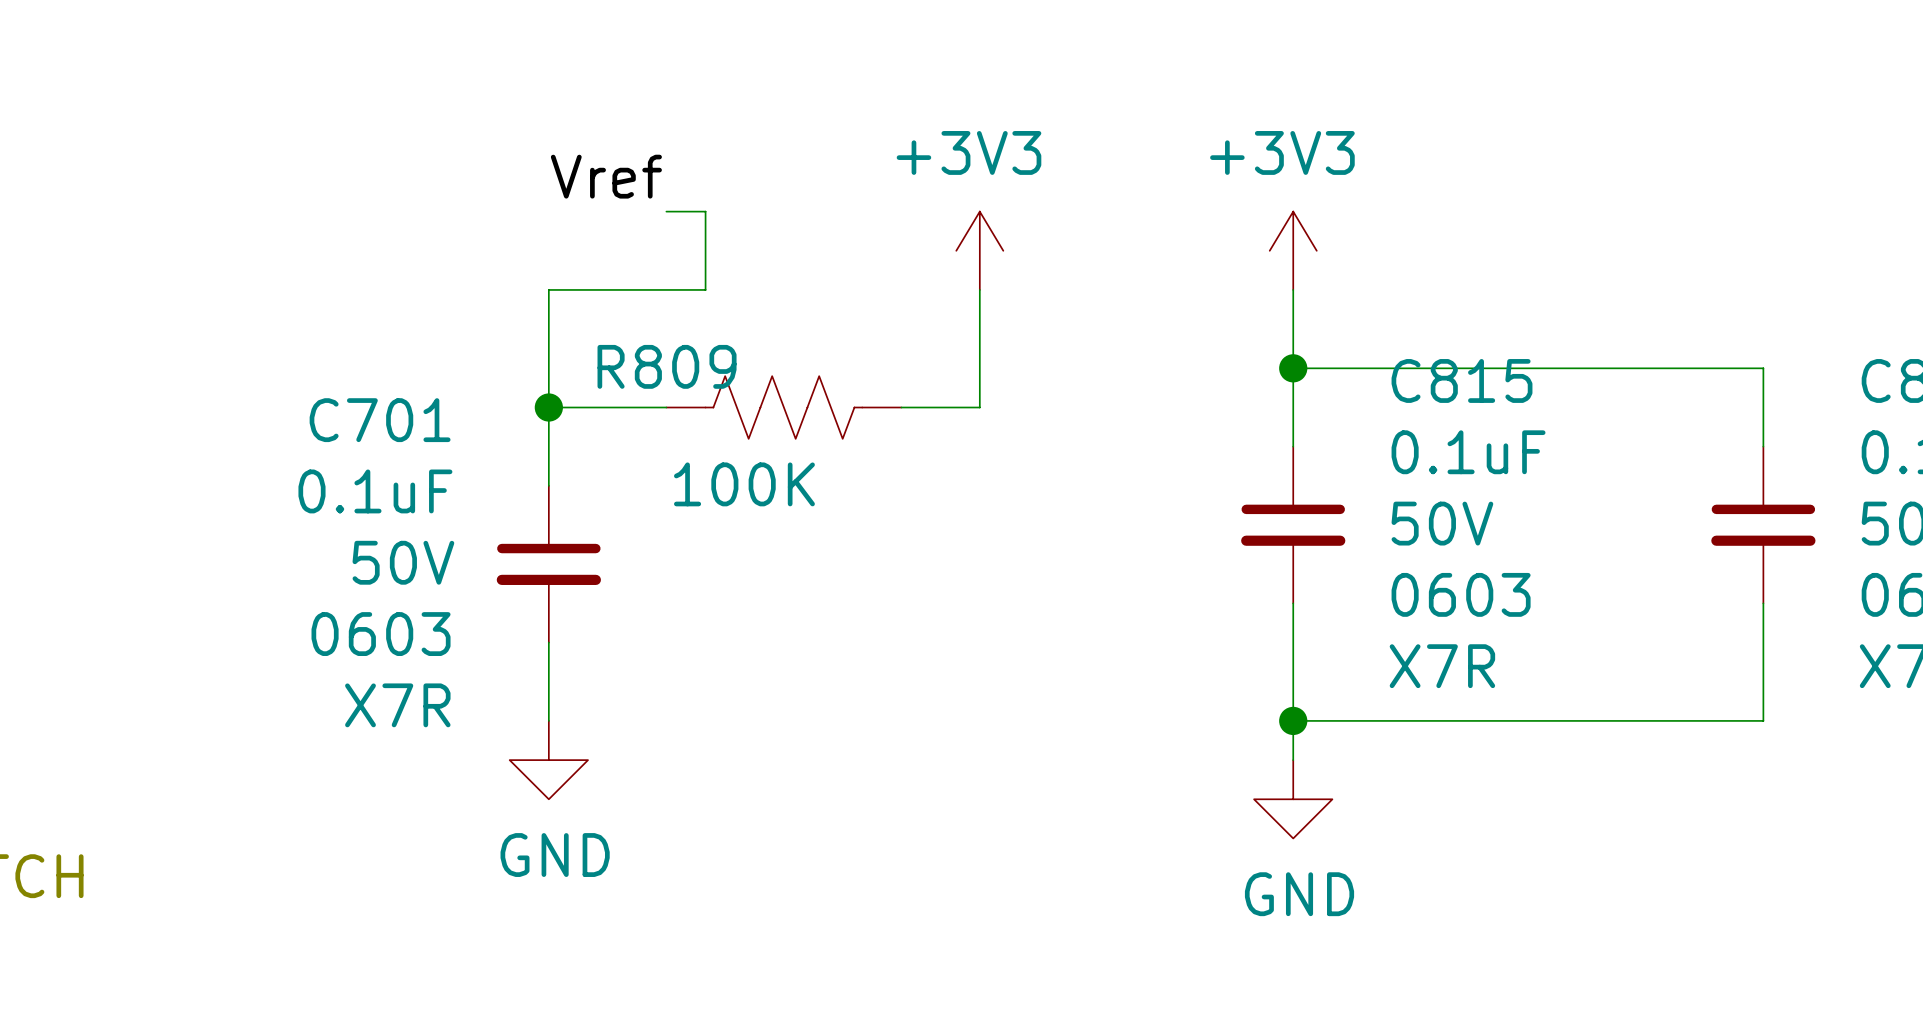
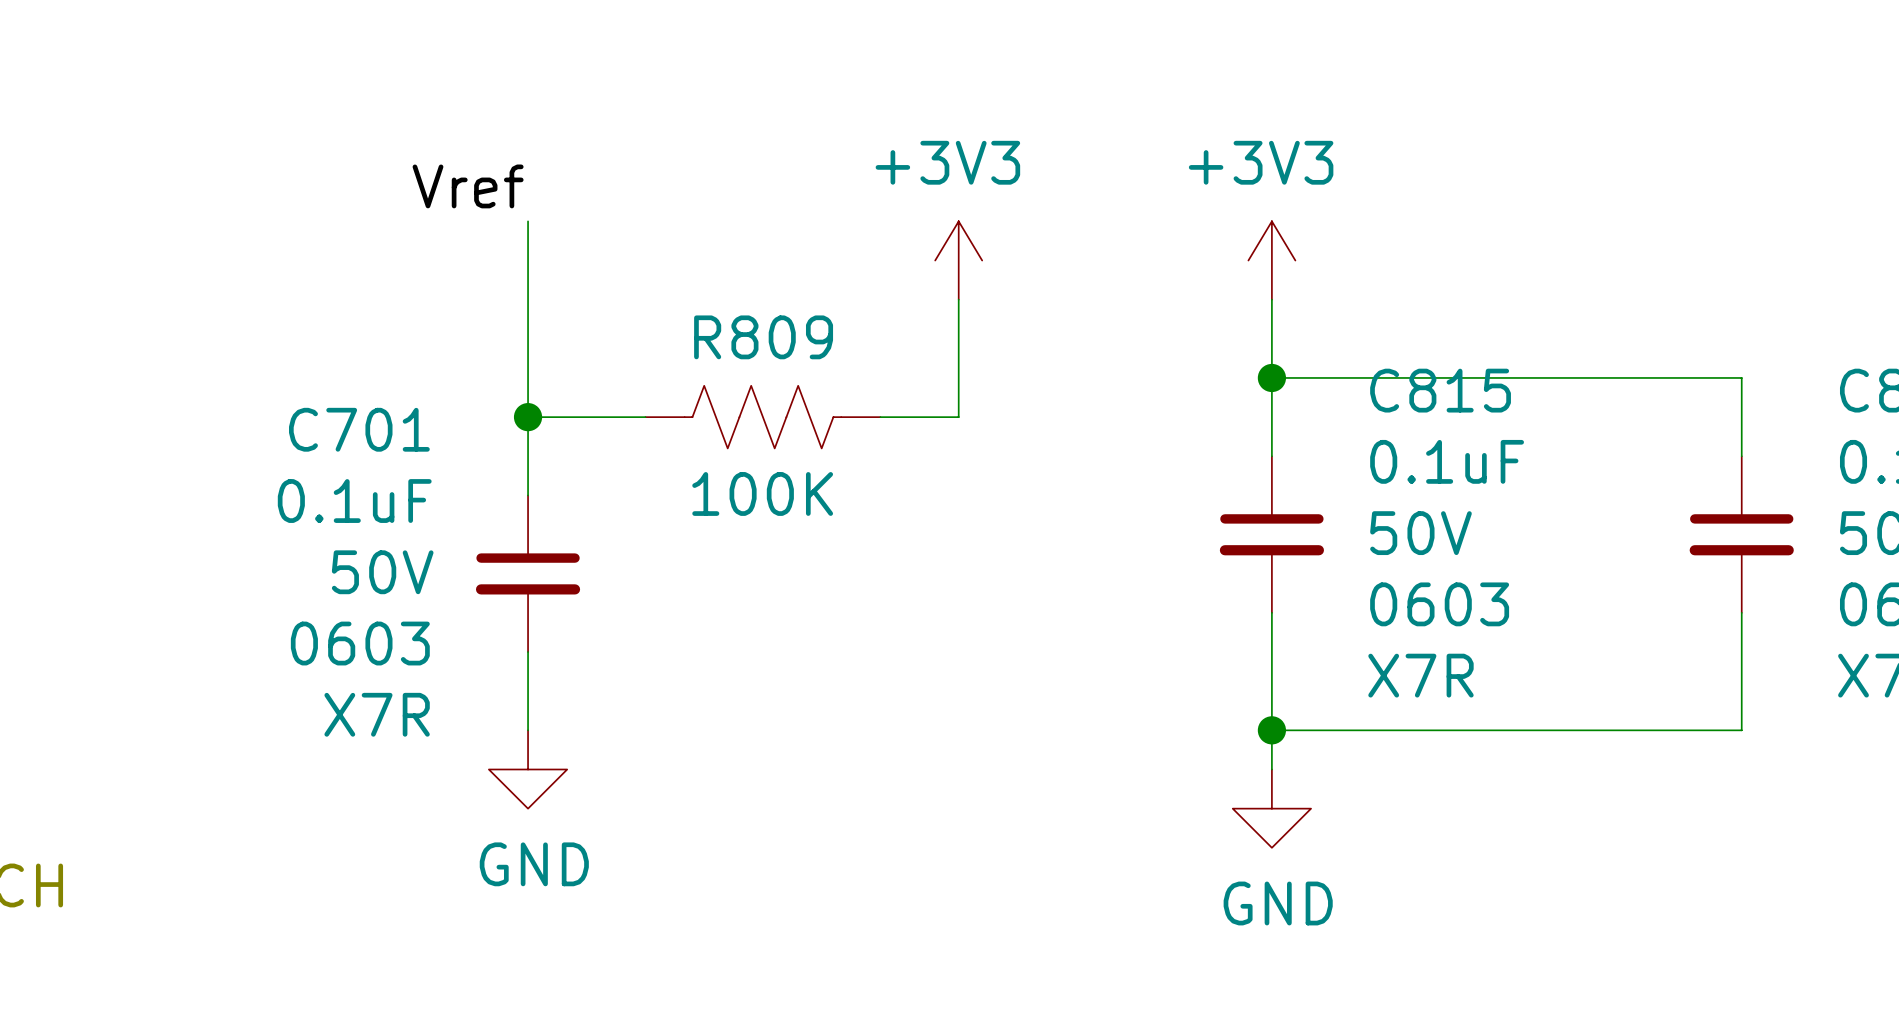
label position: Vref (606, 176) -> Vref (468, 186)
wire: (666, 211) (705, 211) (705, 289) (548, 289) -> (528, 221) (528, 299)
R809 name position: R809 (667, 366) -> R809 (763, 337)
R809 value position: 100K (744, 484) -> 100K (762, 493)

